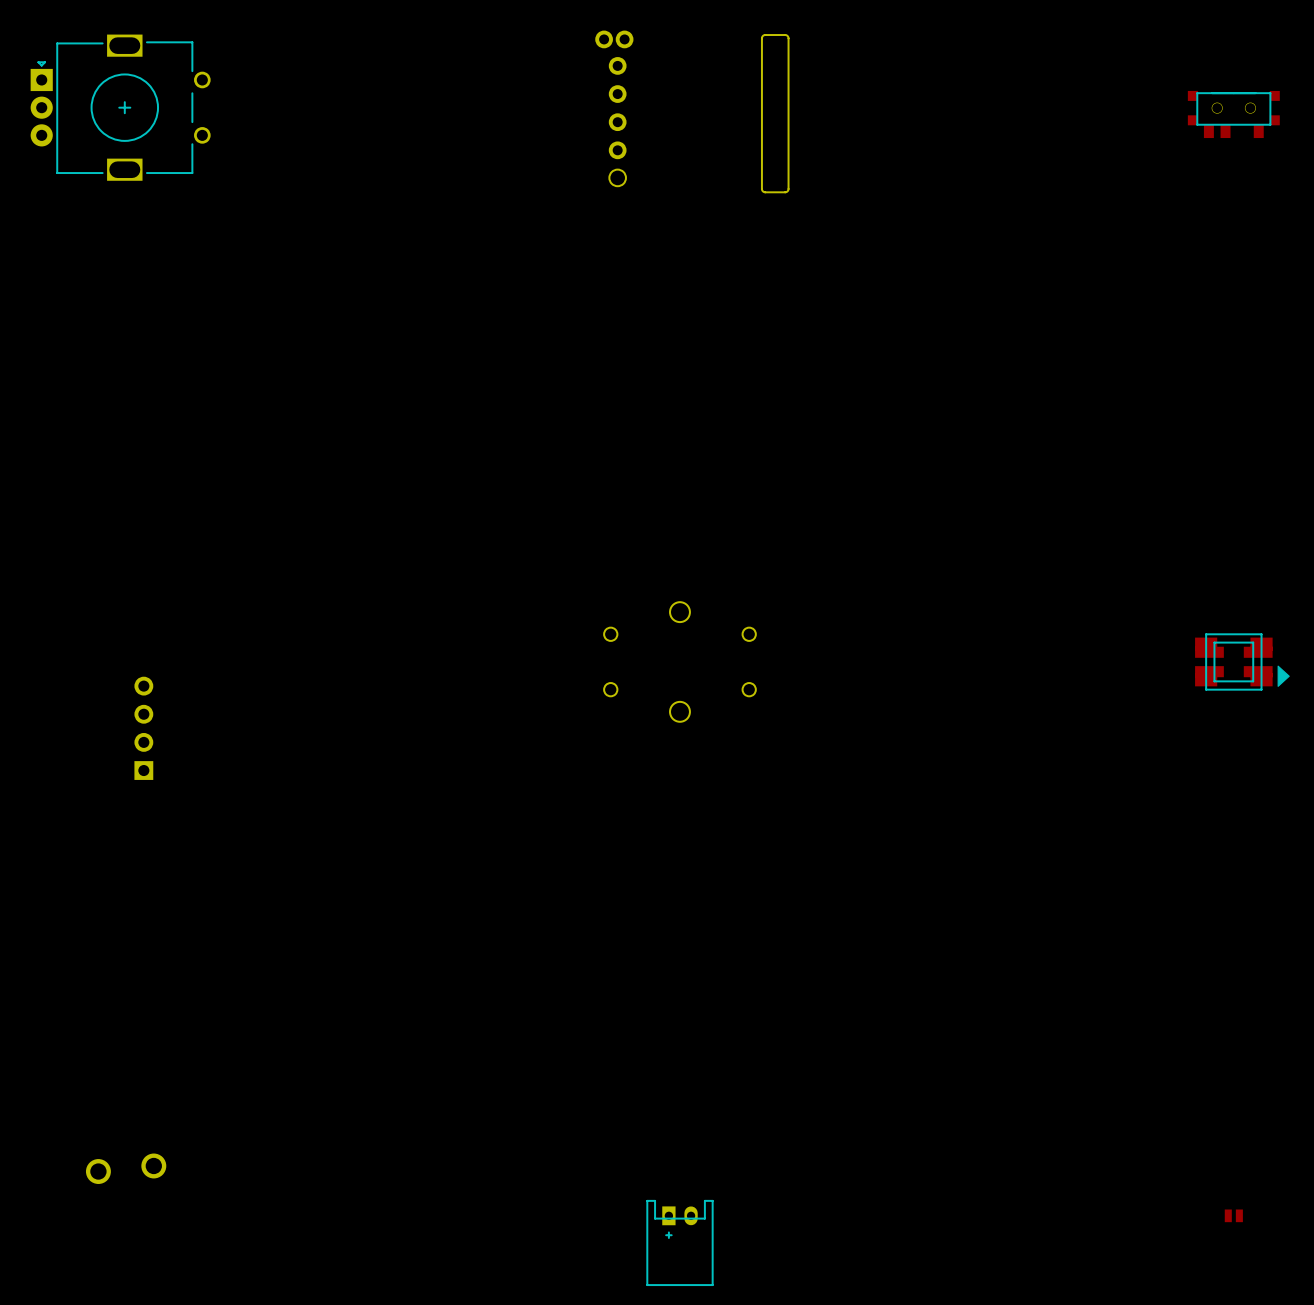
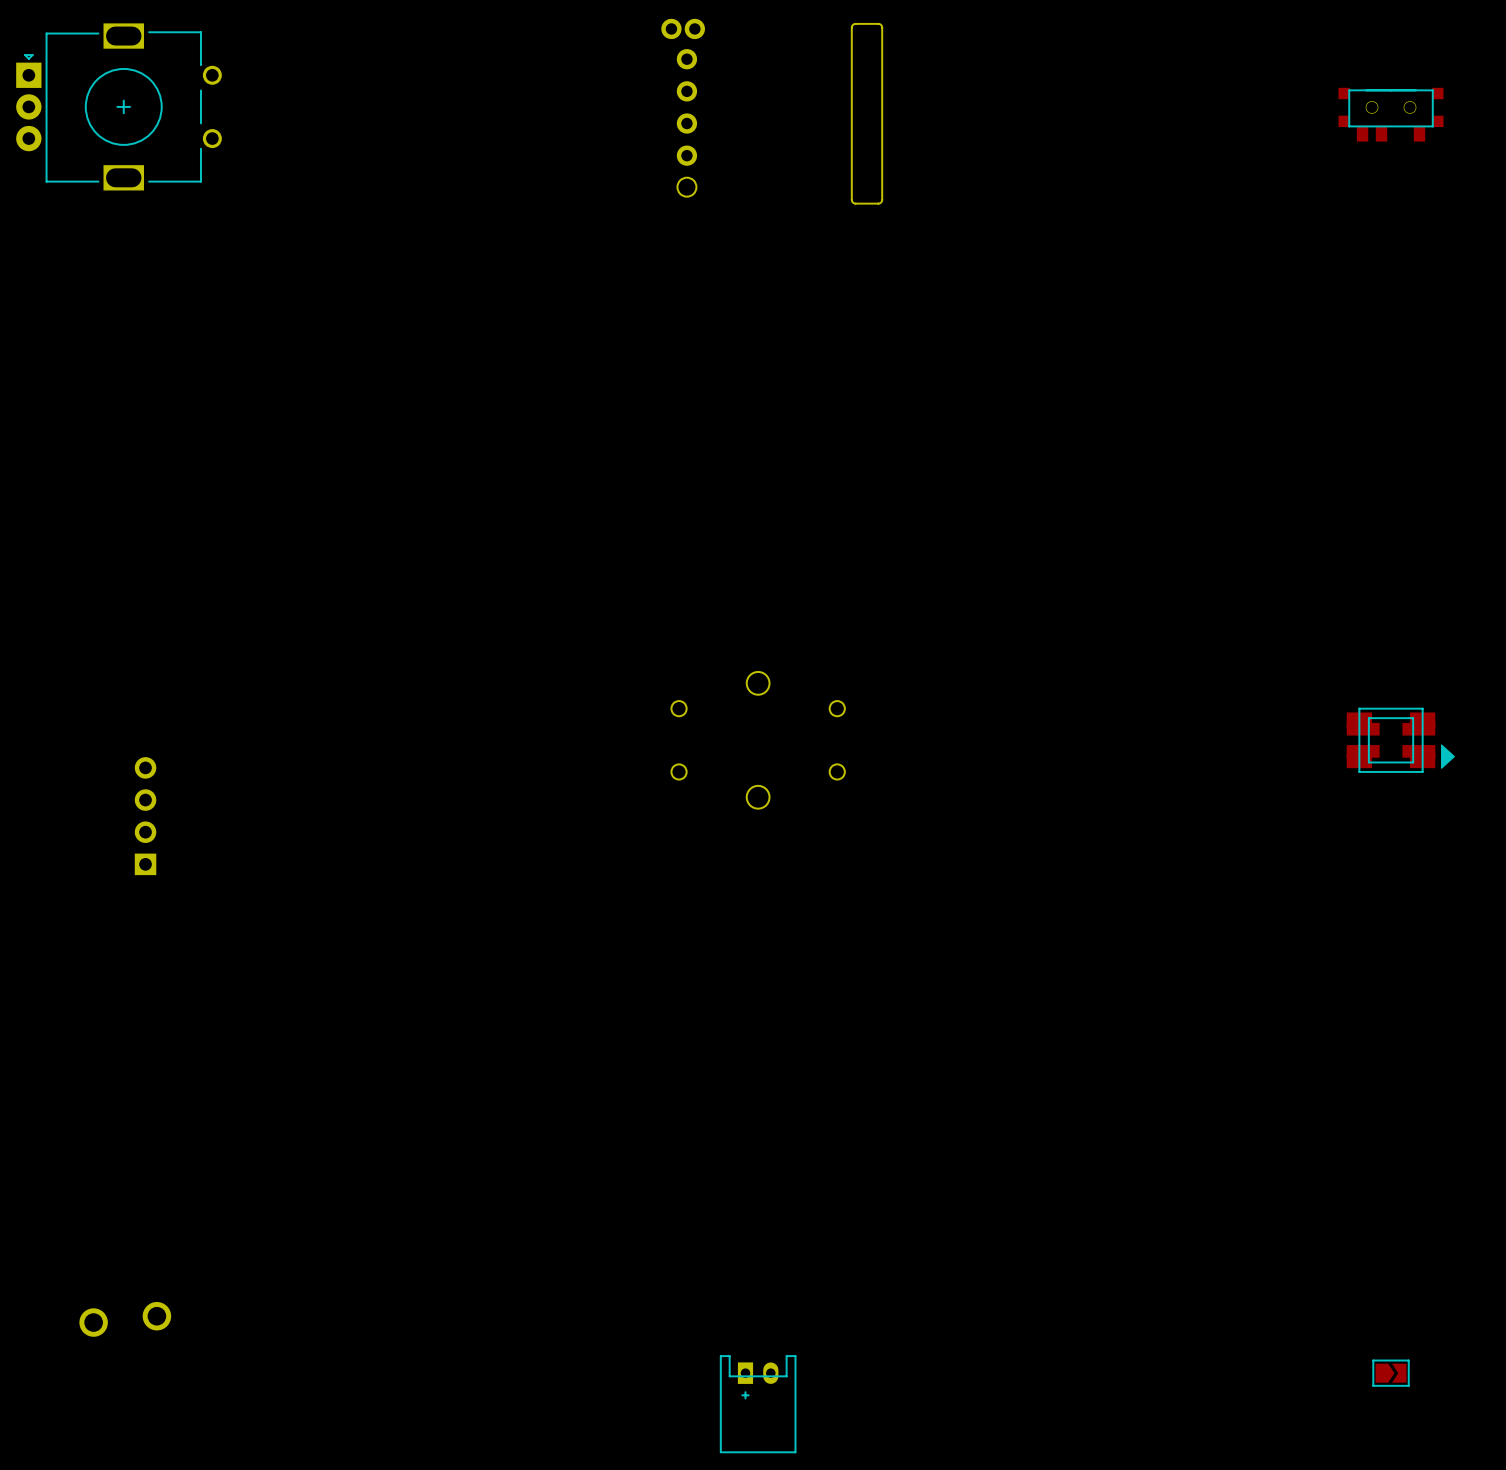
part footprint: [1224, 1209, 1243, 1223] -> [1372, 1359, 1410, 1387]

